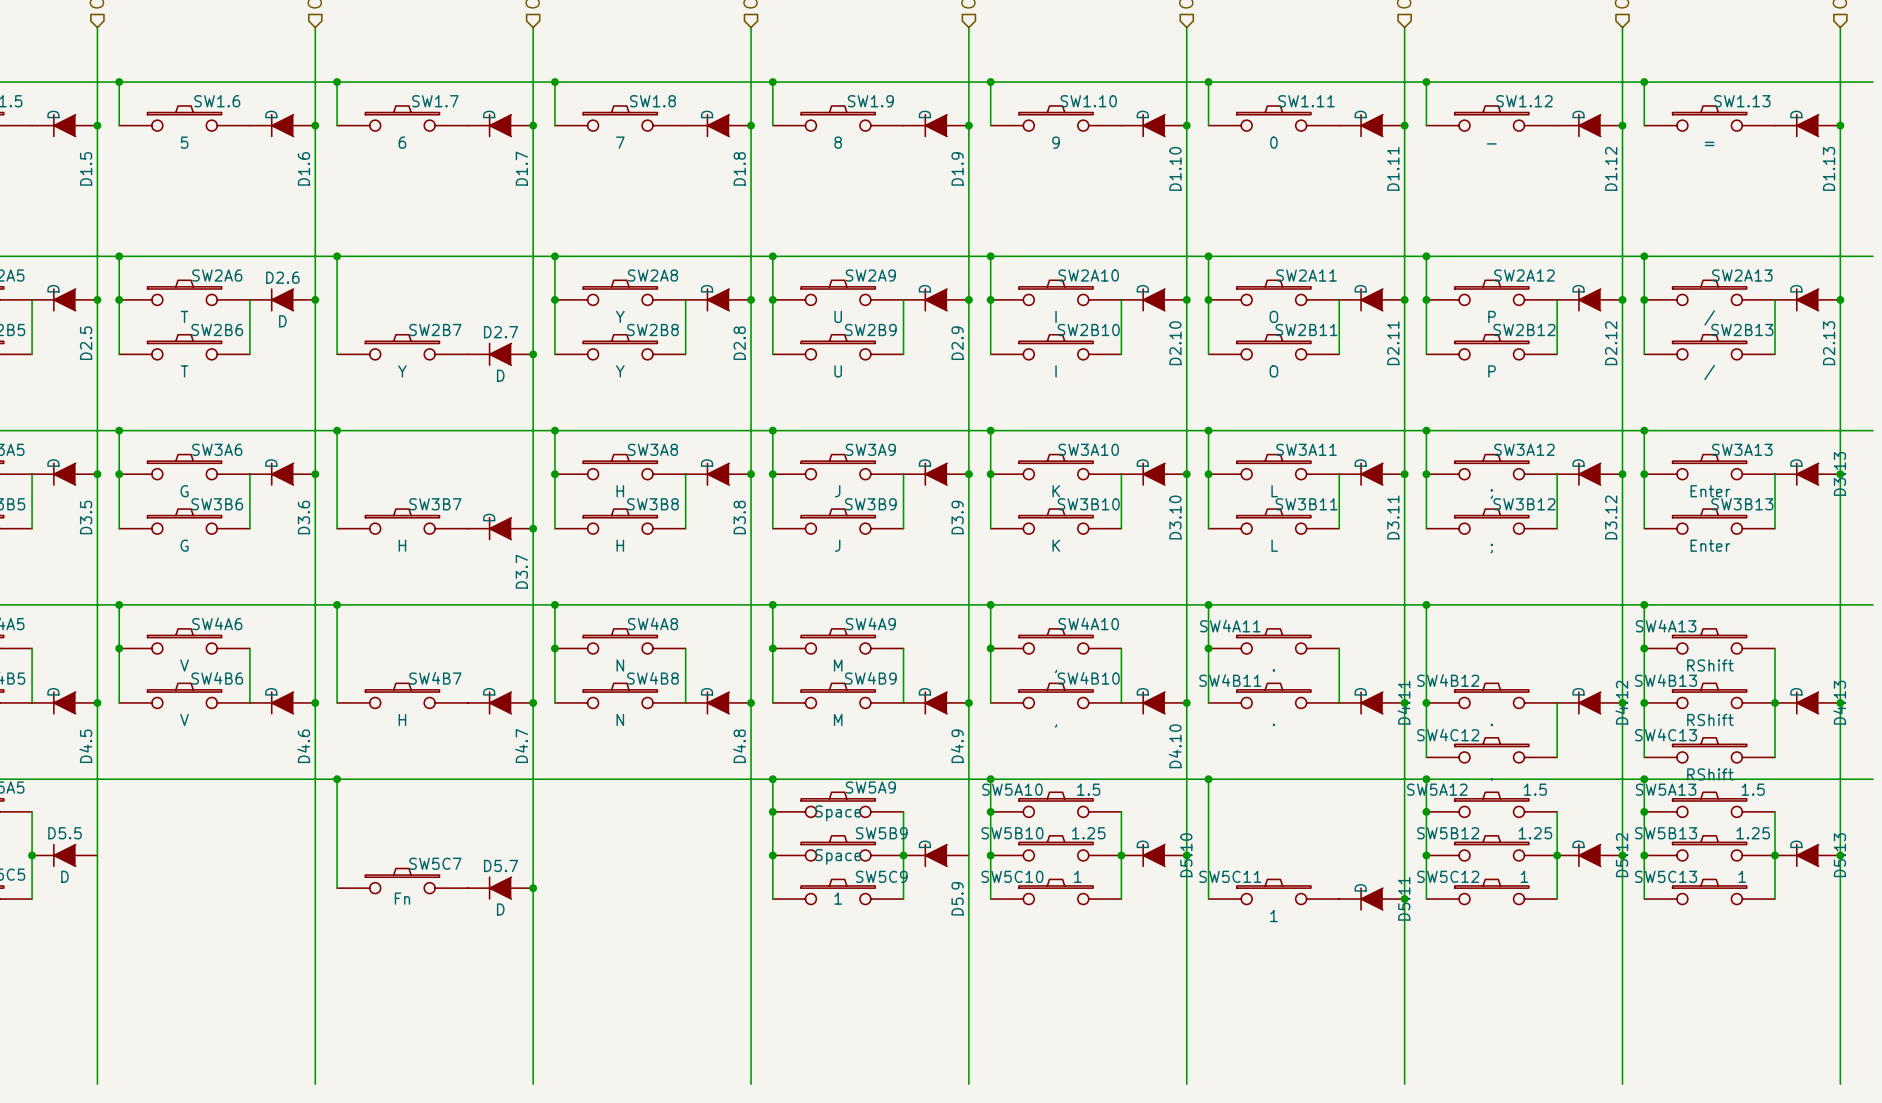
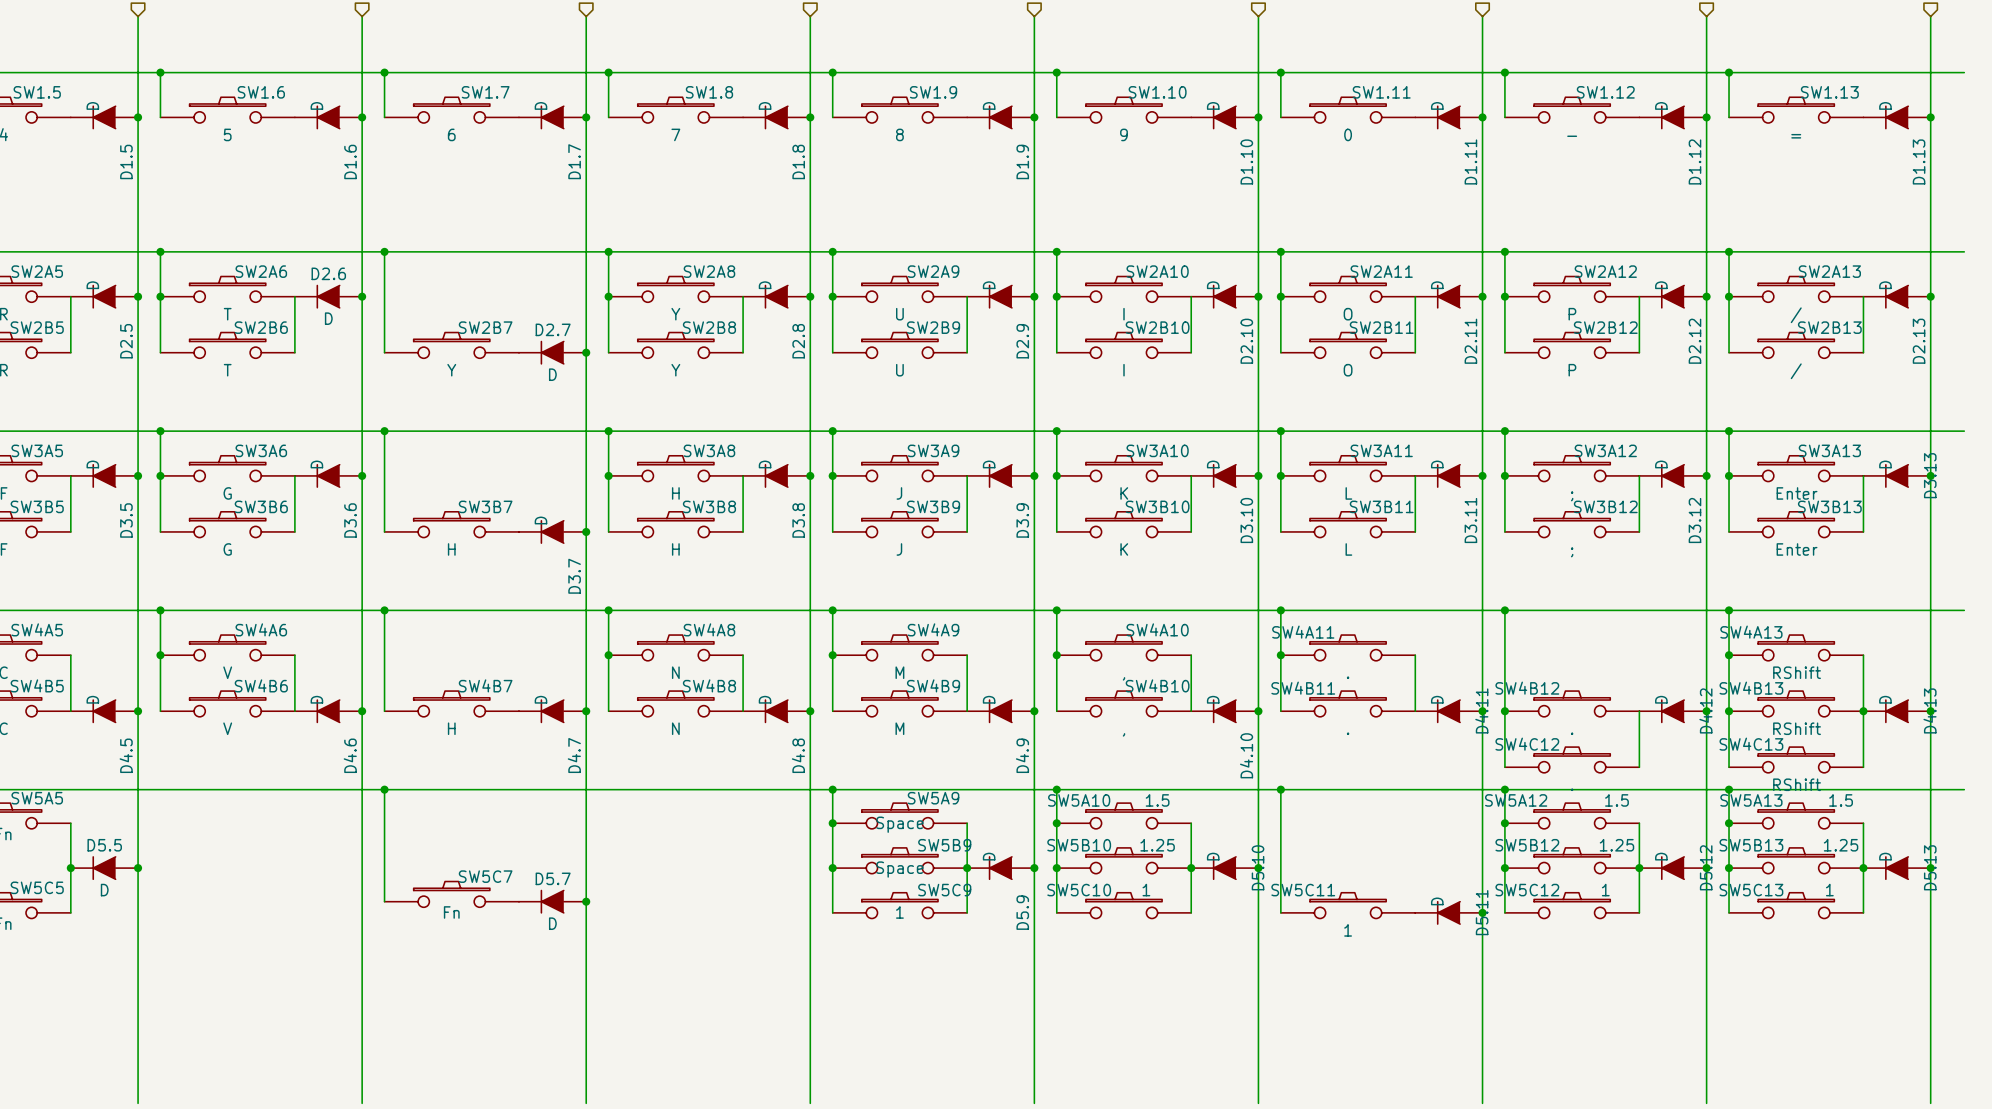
junction: none -> (138, 868)
junction: none -> (1034, 868)

